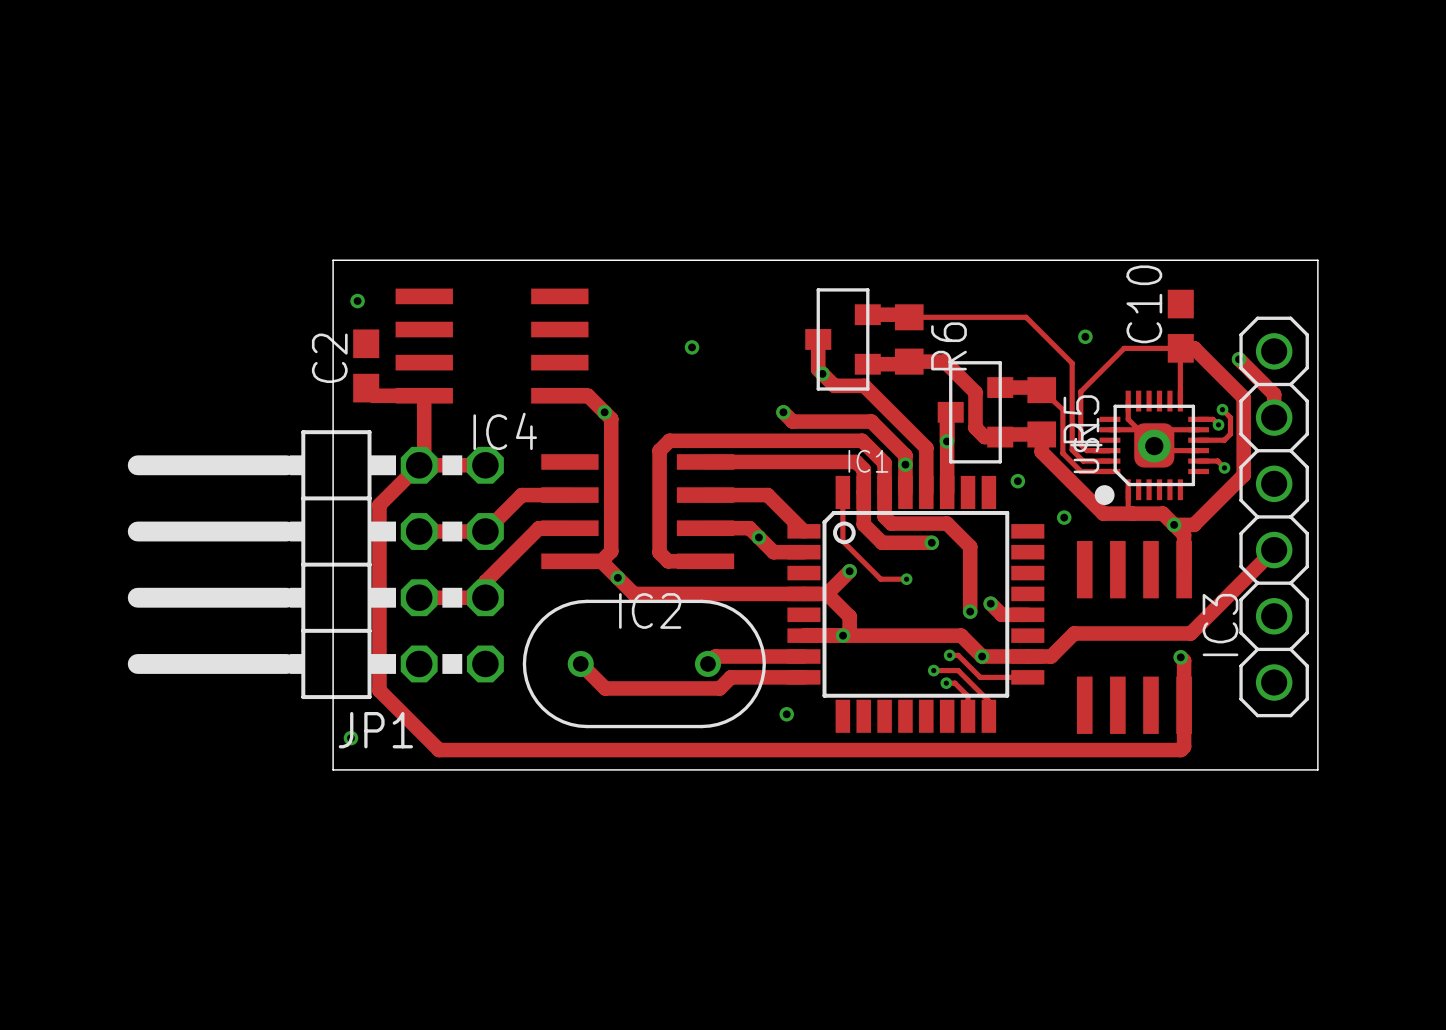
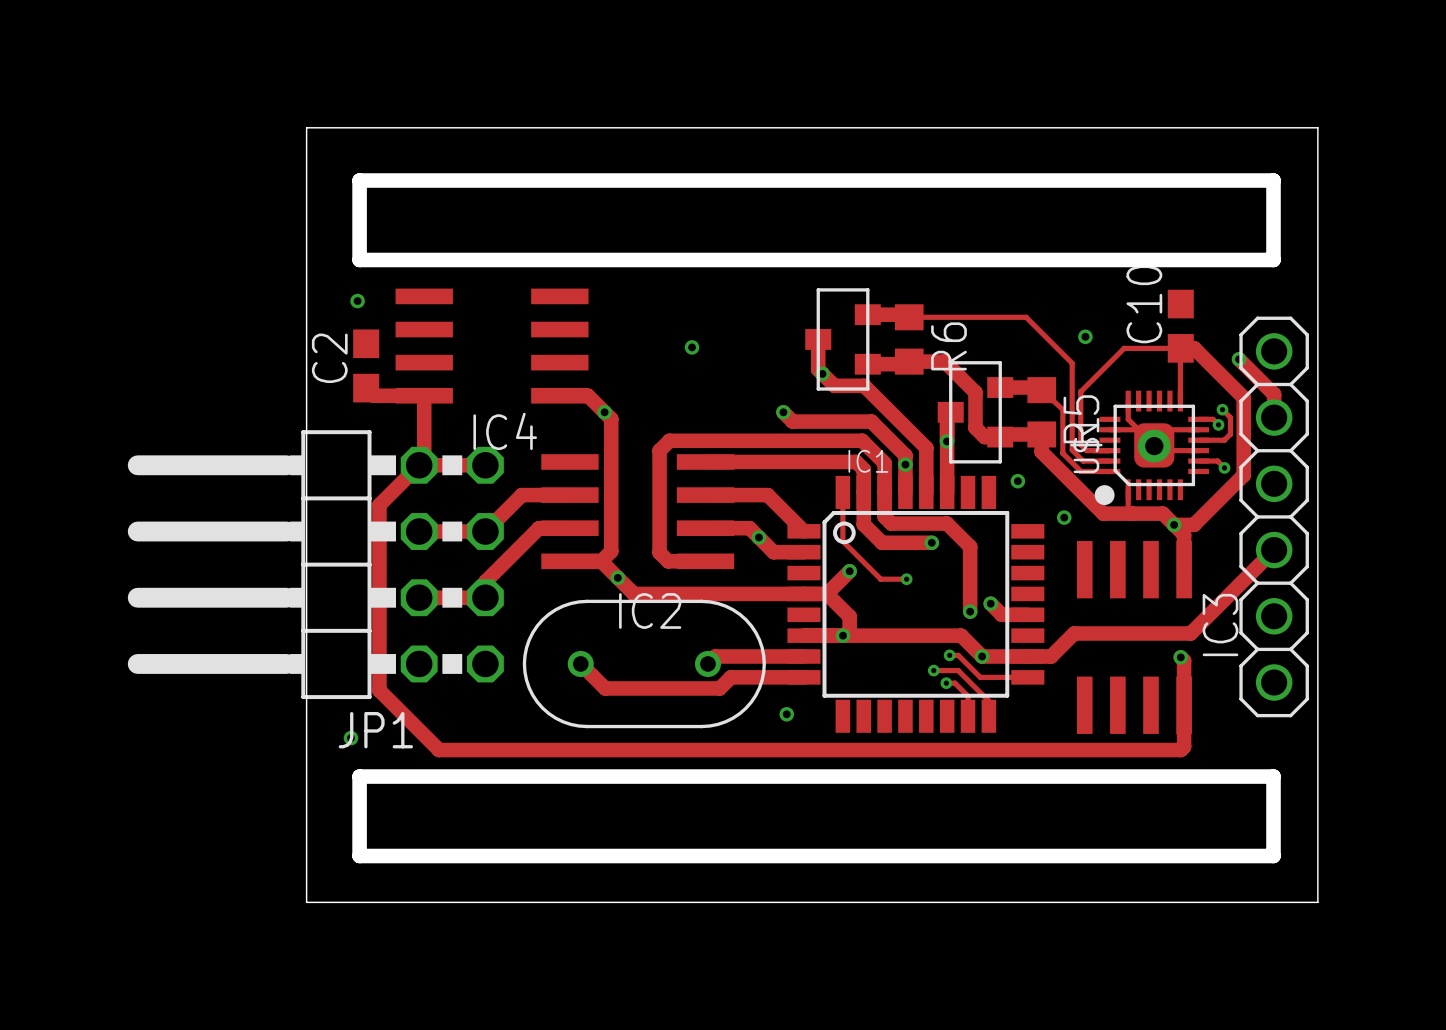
board edge: none -> (359, 180) (1273, 180) (1273, 259) (359, 259) (359, 180)
board edge: (1317, 260) (333, 260) (333, 769) (1317, 769) -> (1317, 260) (1317, 127) (306, 127) (306, 902) (1317, 902) (1317, 769)
board edge: none -> (359, 776) (359, 856) (1273, 856) (1273, 776) (359, 776)

